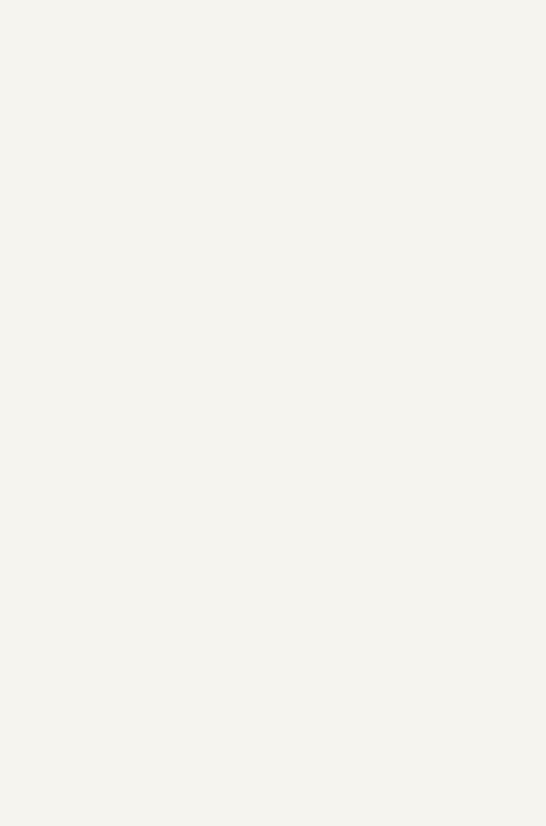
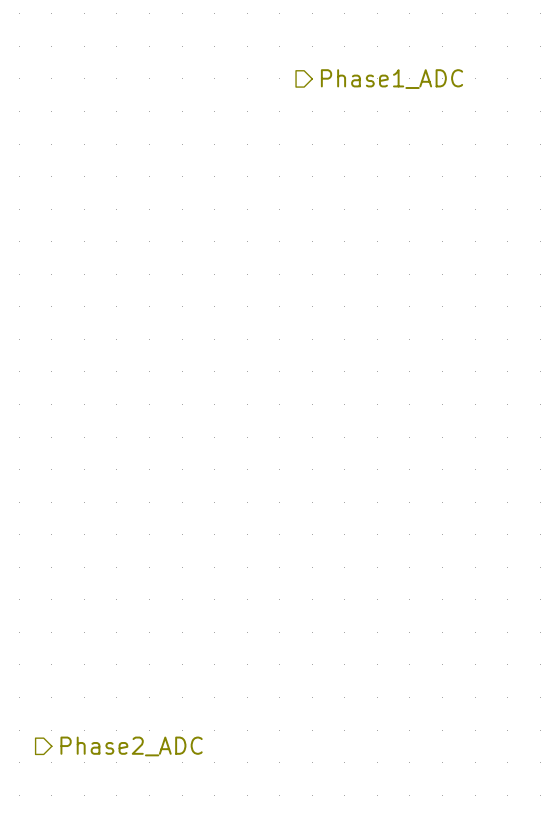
hierarchical label: none -> Phase1_ADC (392, 79)
hierarchical label: none -> Phase2_ADC (131, 746)

